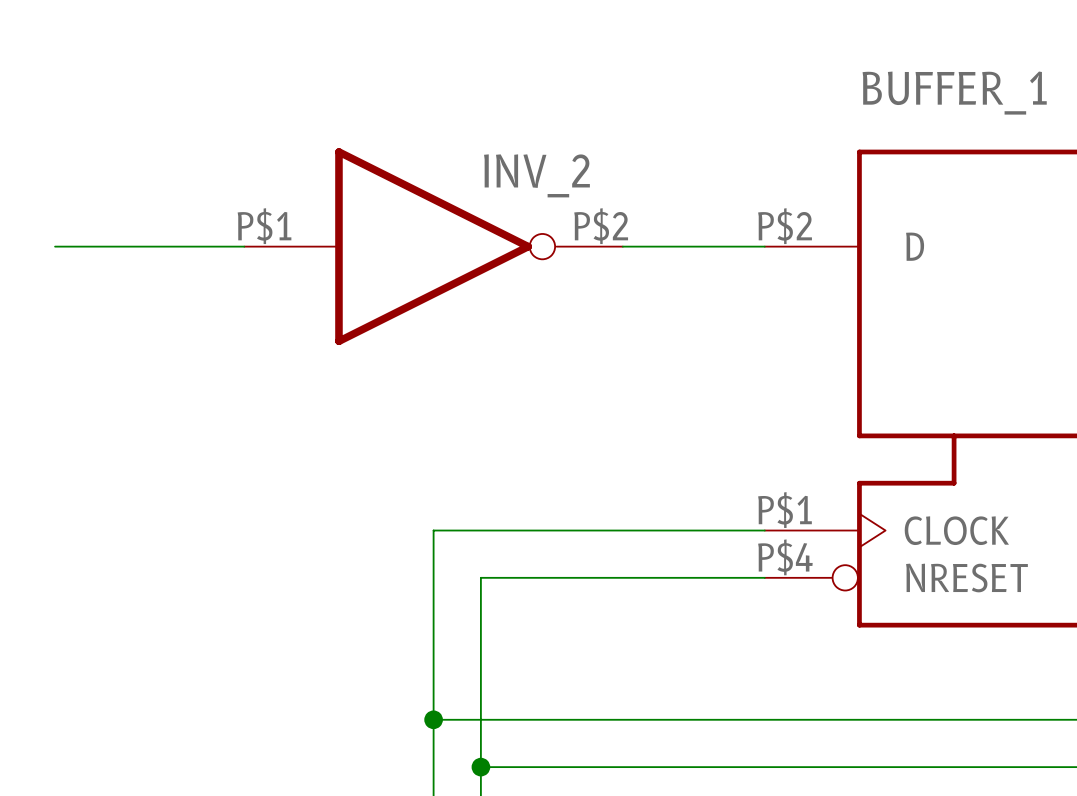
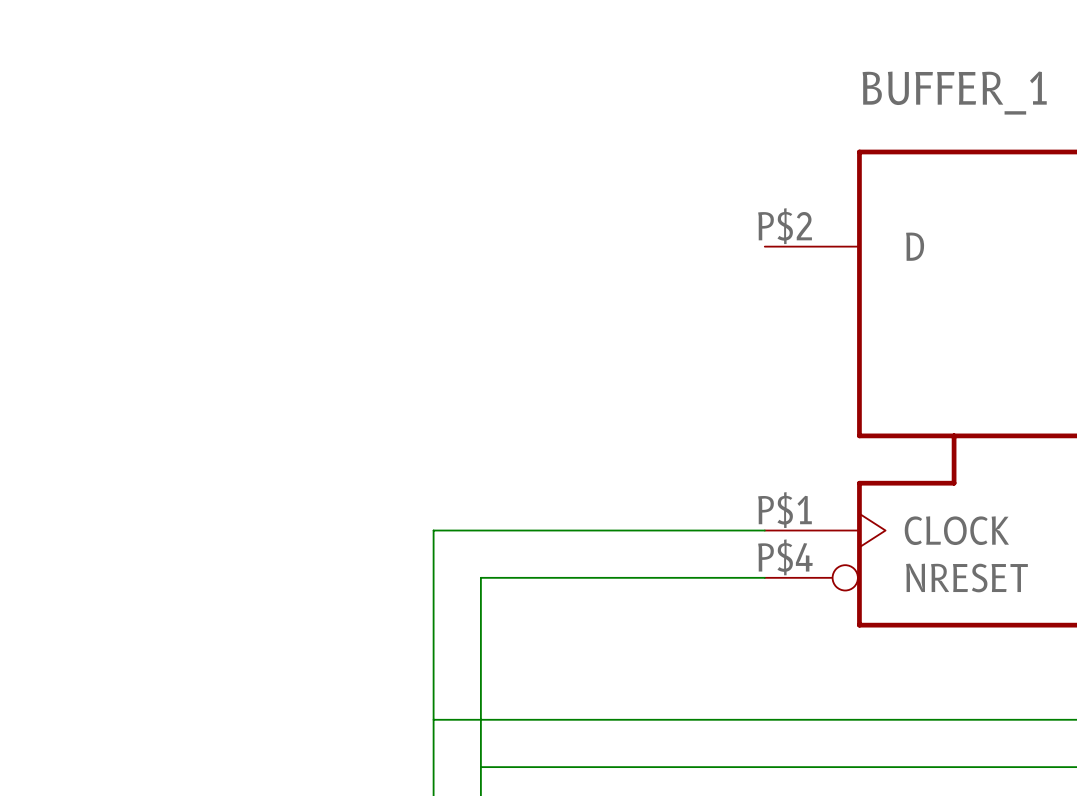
wire: (55, 246) (244, 246) -> none
INV_2: (433, 246) -> none
wire: (622, 246) (764, 246) -> none
junction: (433, 719) -> none
junction: (480, 767) -> none

